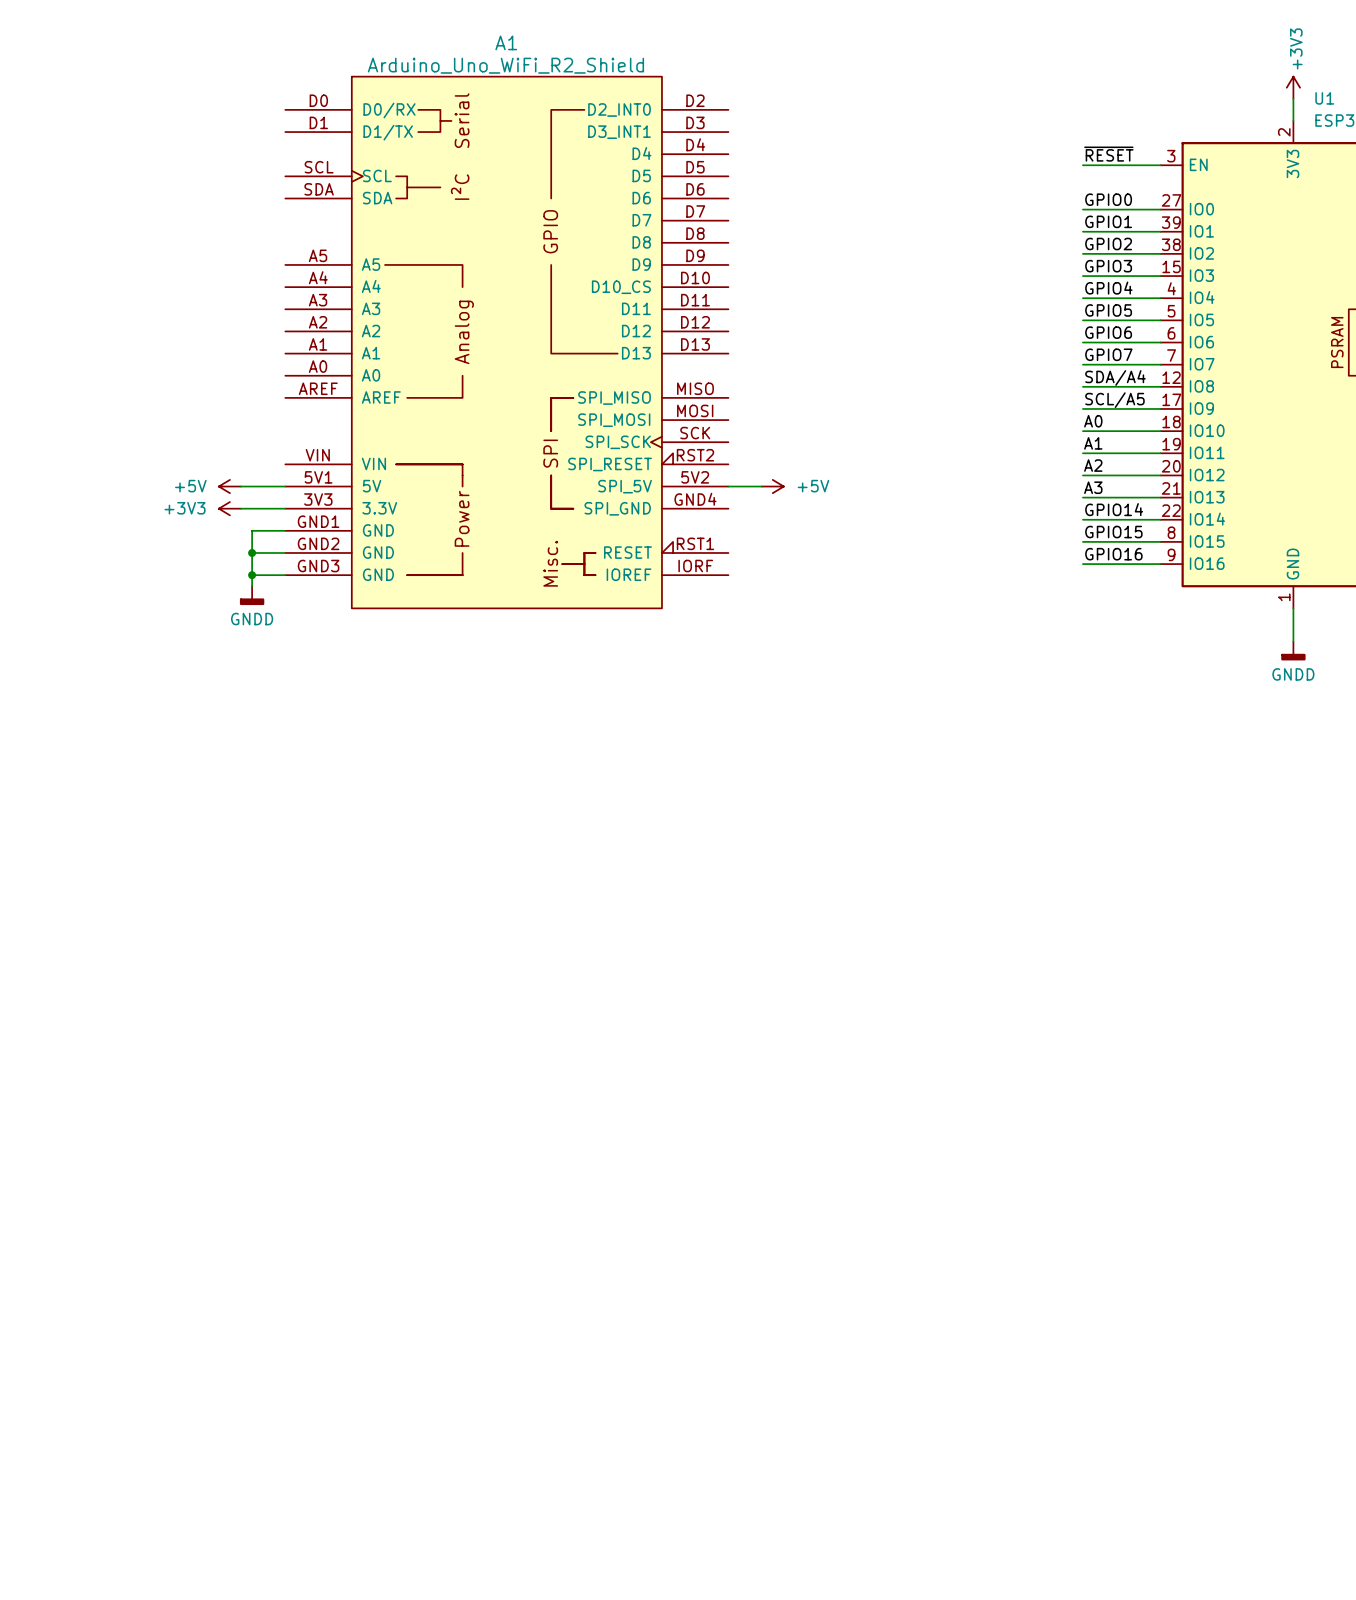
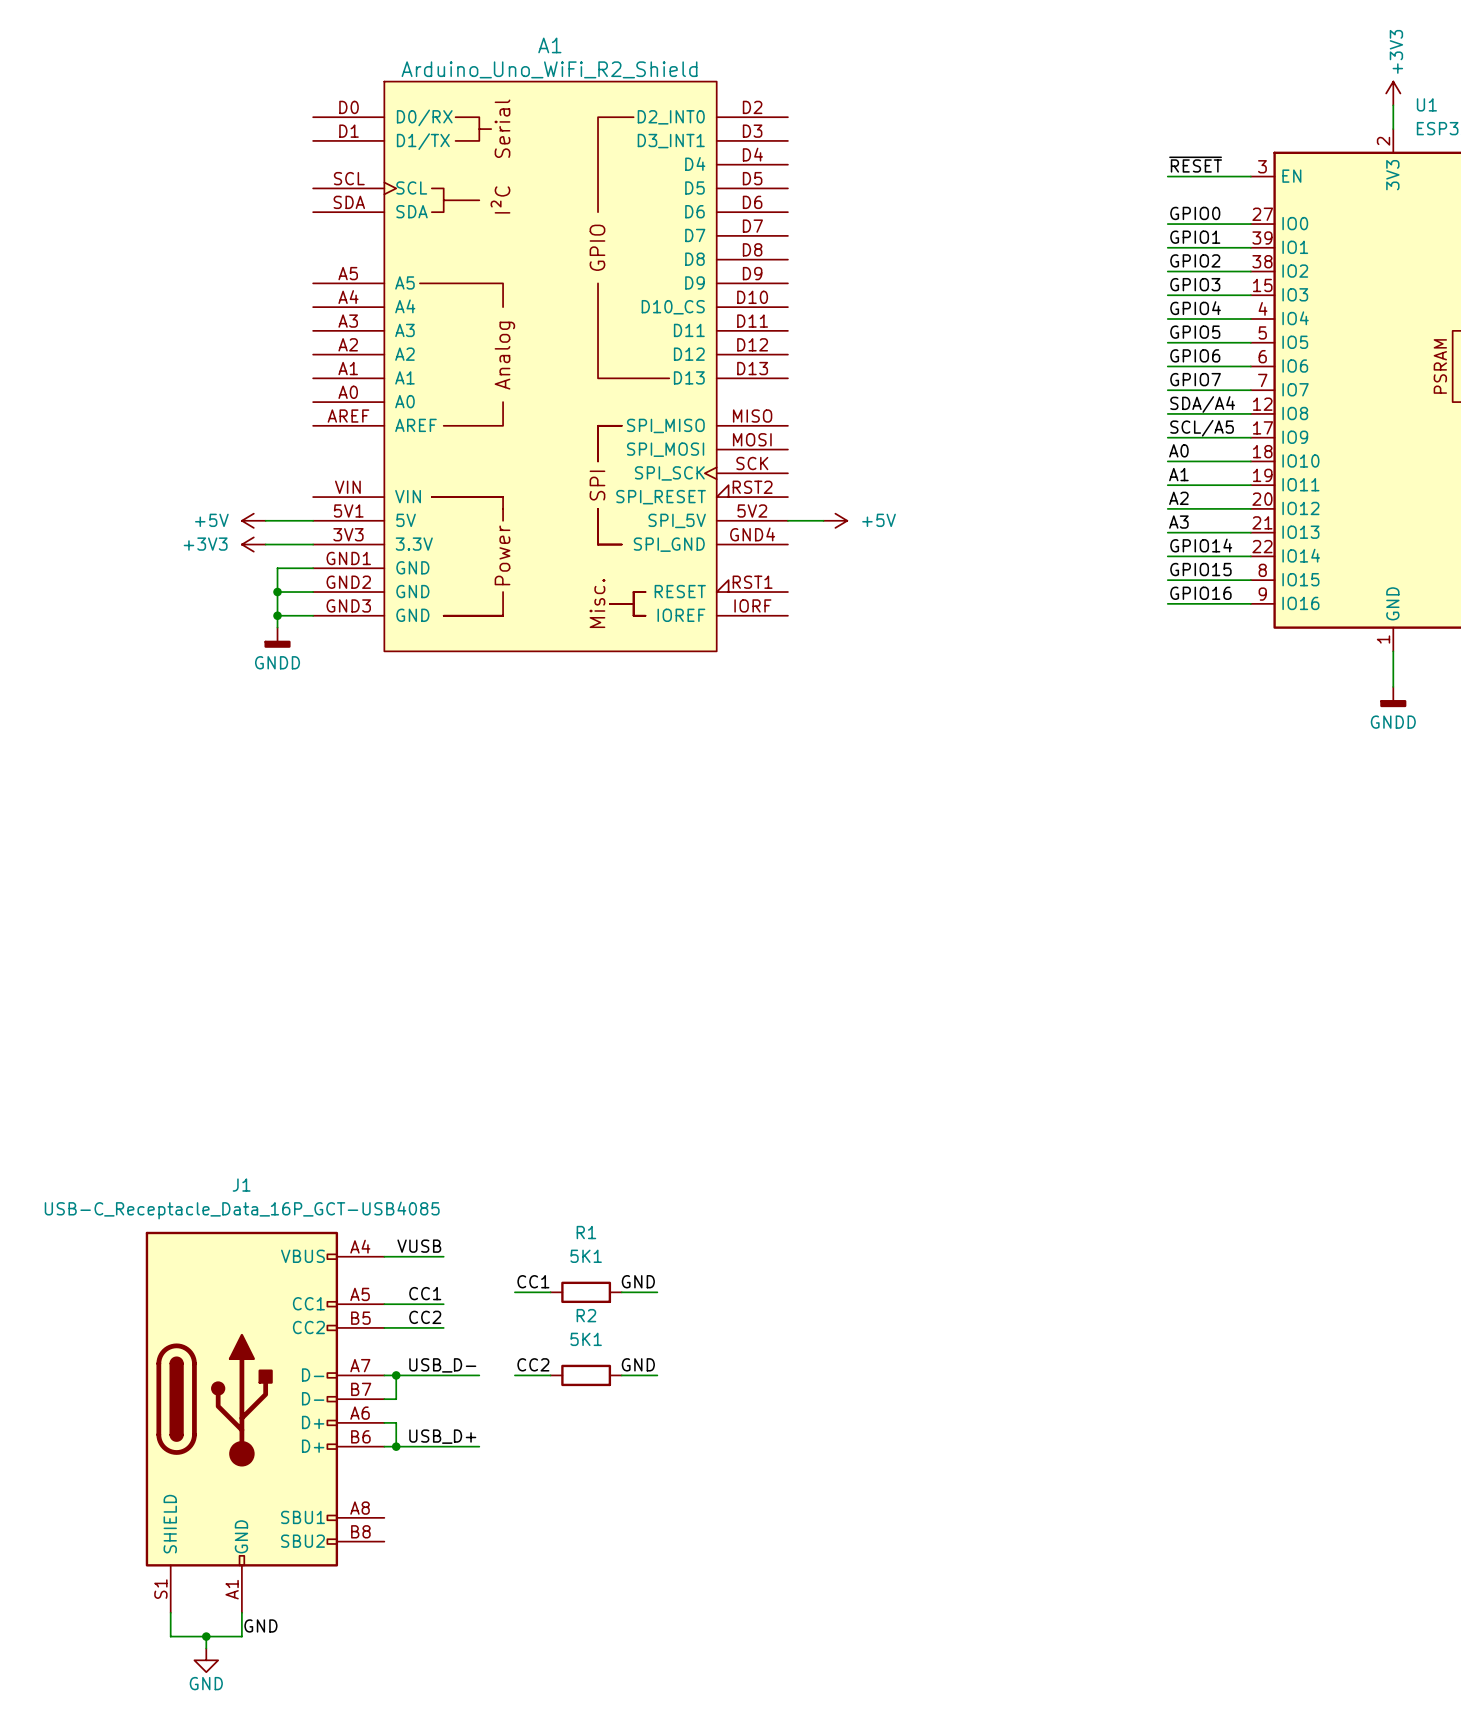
label: none -> VUSB (419, 1246)
wire: none -> (384, 1256) (443, 1256)
label: none -> CC1 (533, 1281)
label: none -> GND (638, 1281)
wire: none -> (514, 1292) (550, 1292)
R1: none -> 5K1 (586, 1292)
wire: none -> (621, 1292) (657, 1292)
label: none -> CC1 (425, 1293)
wire: none -> (384, 1304) (443, 1304)
label: none -> CC2 (425, 1317)
wire: none -> (384, 1327) (443, 1327)
label: none -> USB_D- (442, 1365)
label: none -> CC2 (533, 1364)
label: none -> GND (638, 1364)
wire: none -> (384, 1375) (479, 1375)
wire: none -> (396, 1375) (396, 1399) (384, 1399)
junction: none -> (396, 1375)
wire: none -> (514, 1375) (550, 1375)
R2: none -> 5K1 (586, 1375)
wire: none -> (621, 1375) (657, 1375)
J1: none -> USB-C_Receptacle_Data_16P_GCT-USB4085 (265, 1422)
wire: none -> (384, 1422) (396, 1422) (396, 1446)
label: none -> USB_D+ (442, 1436)
wire: none -> (384, 1446) (479, 1446)
junction: none -> (396, 1446)
wire: none -> (170, 1612) (170, 1636) (241, 1636) (241, 1612)
label: none -> GND (260, 1625)
wire: none -> (206, 1636) (206, 1648)
junction: none -> (206, 1636)
power symbol: none -> GND (206, 1660)

